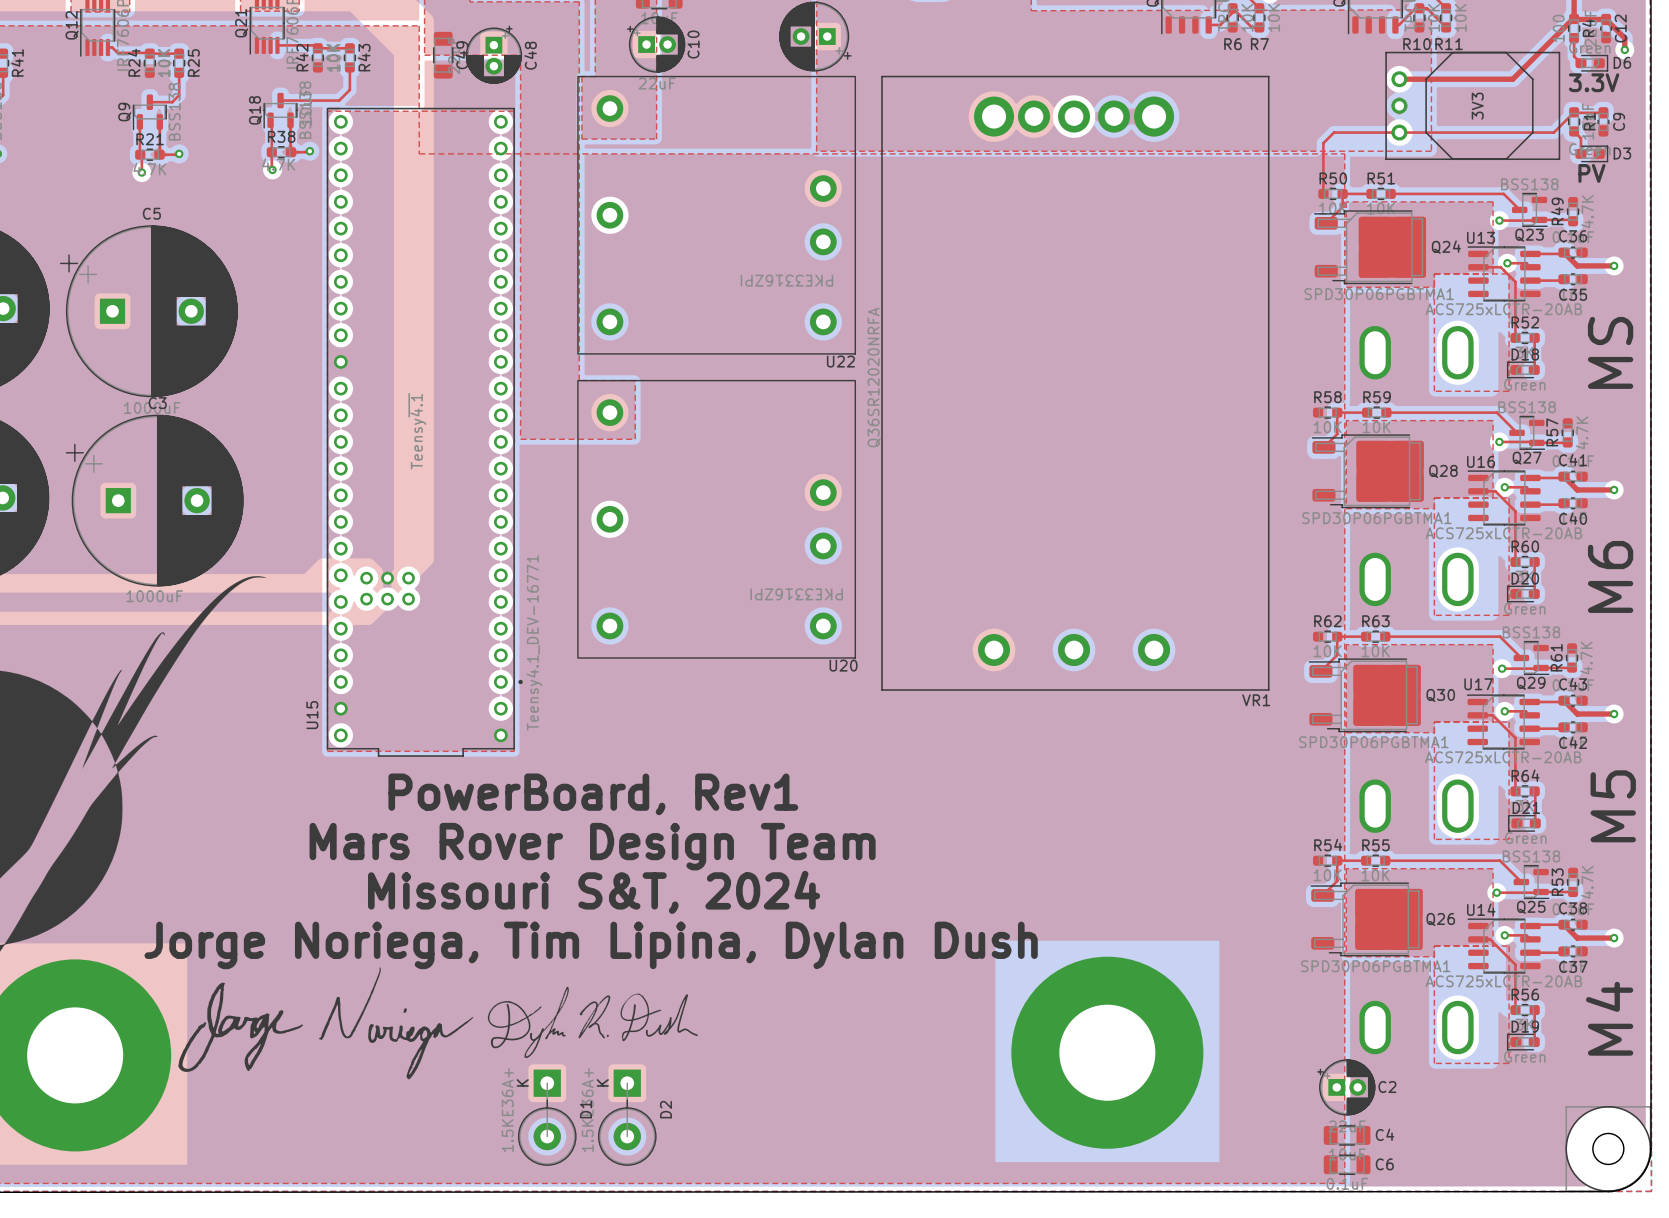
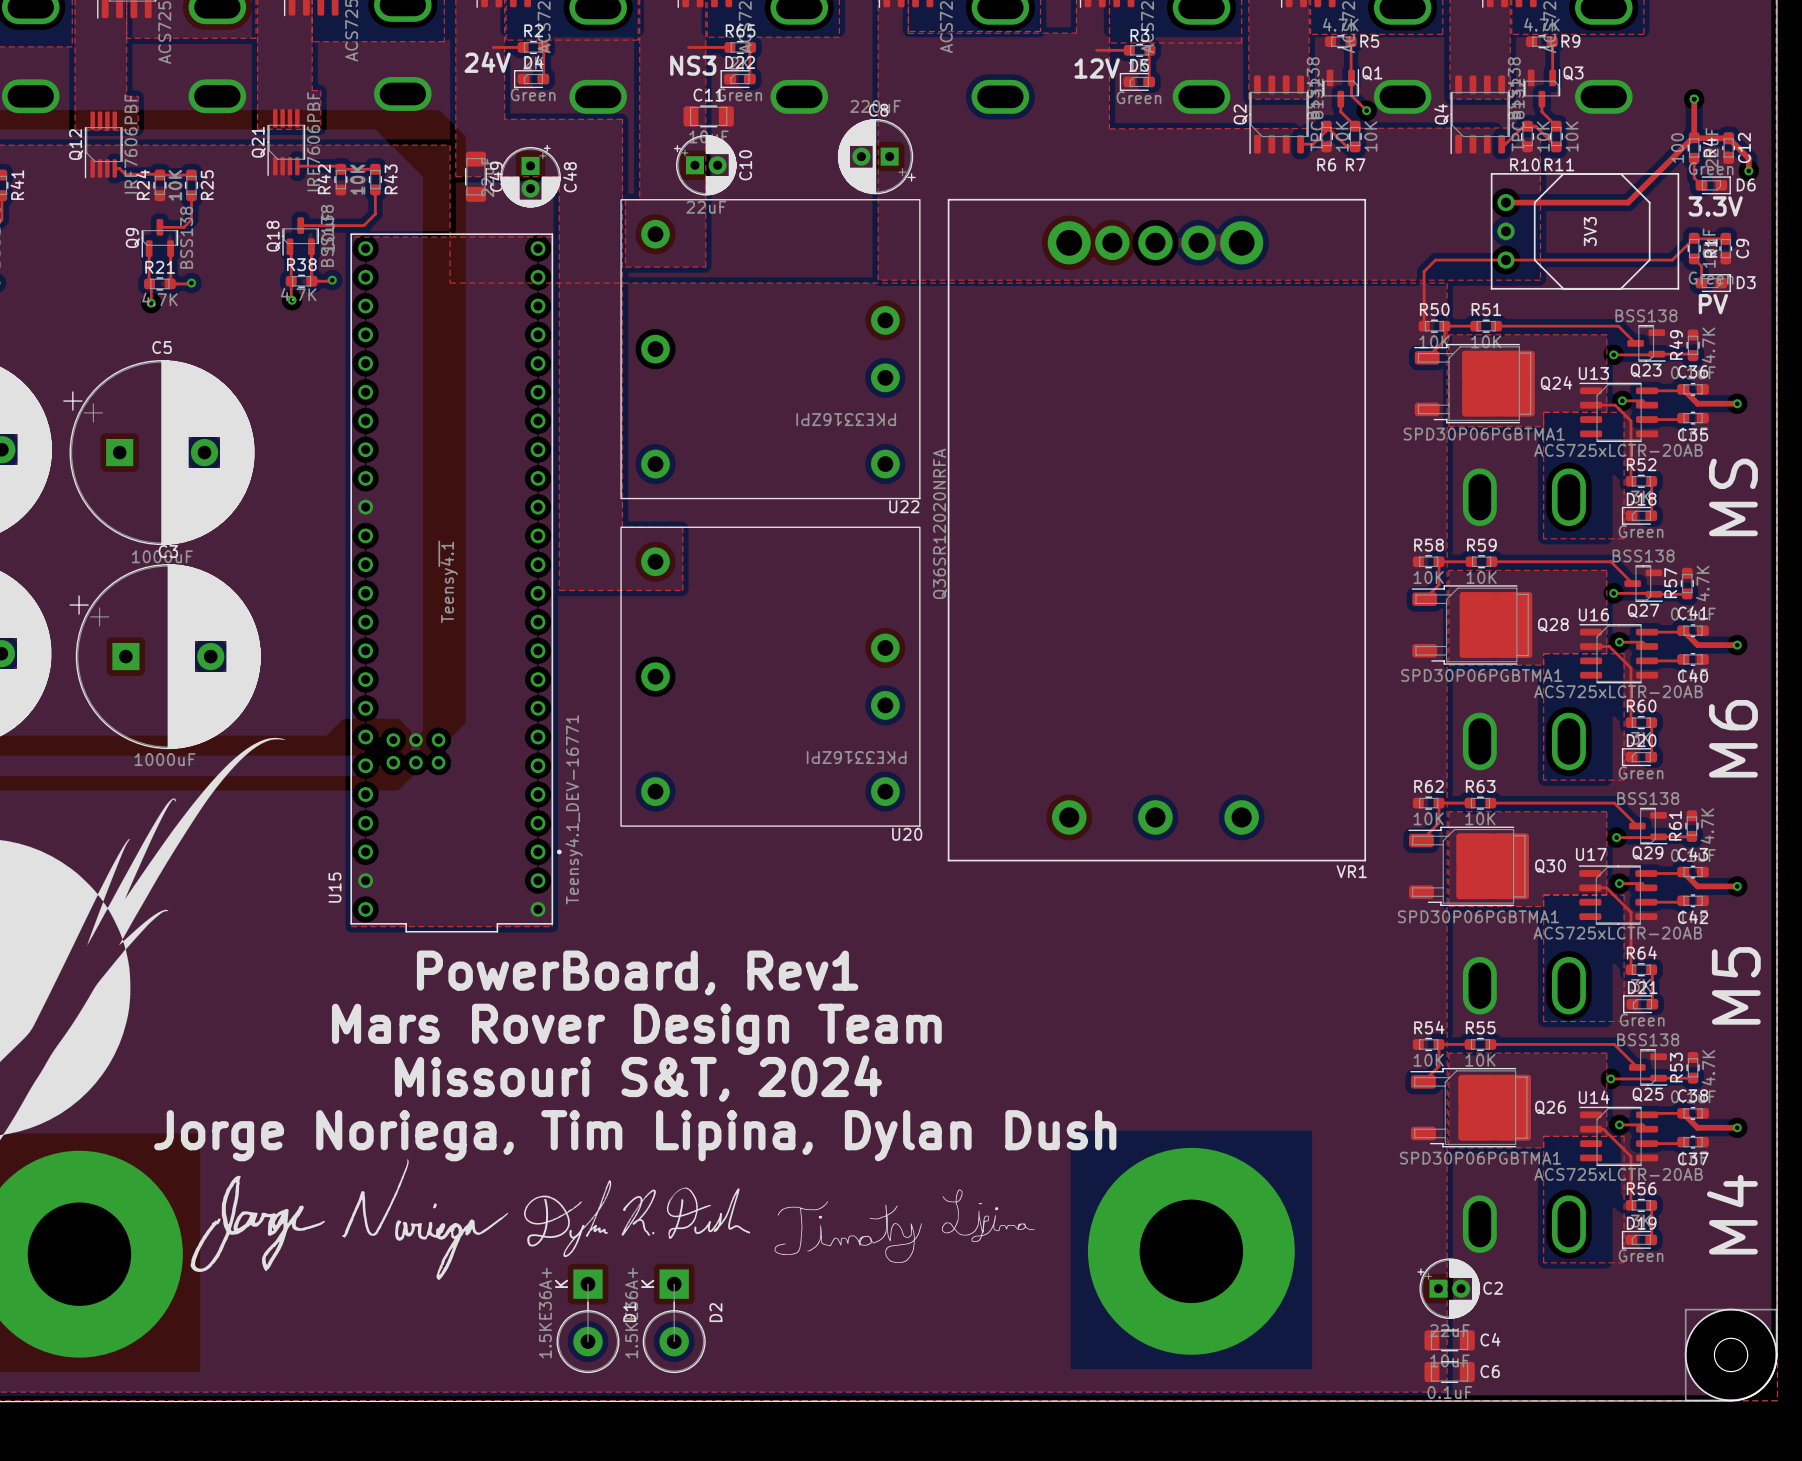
drawing: none -> [774, 1189, 1036, 1264]

